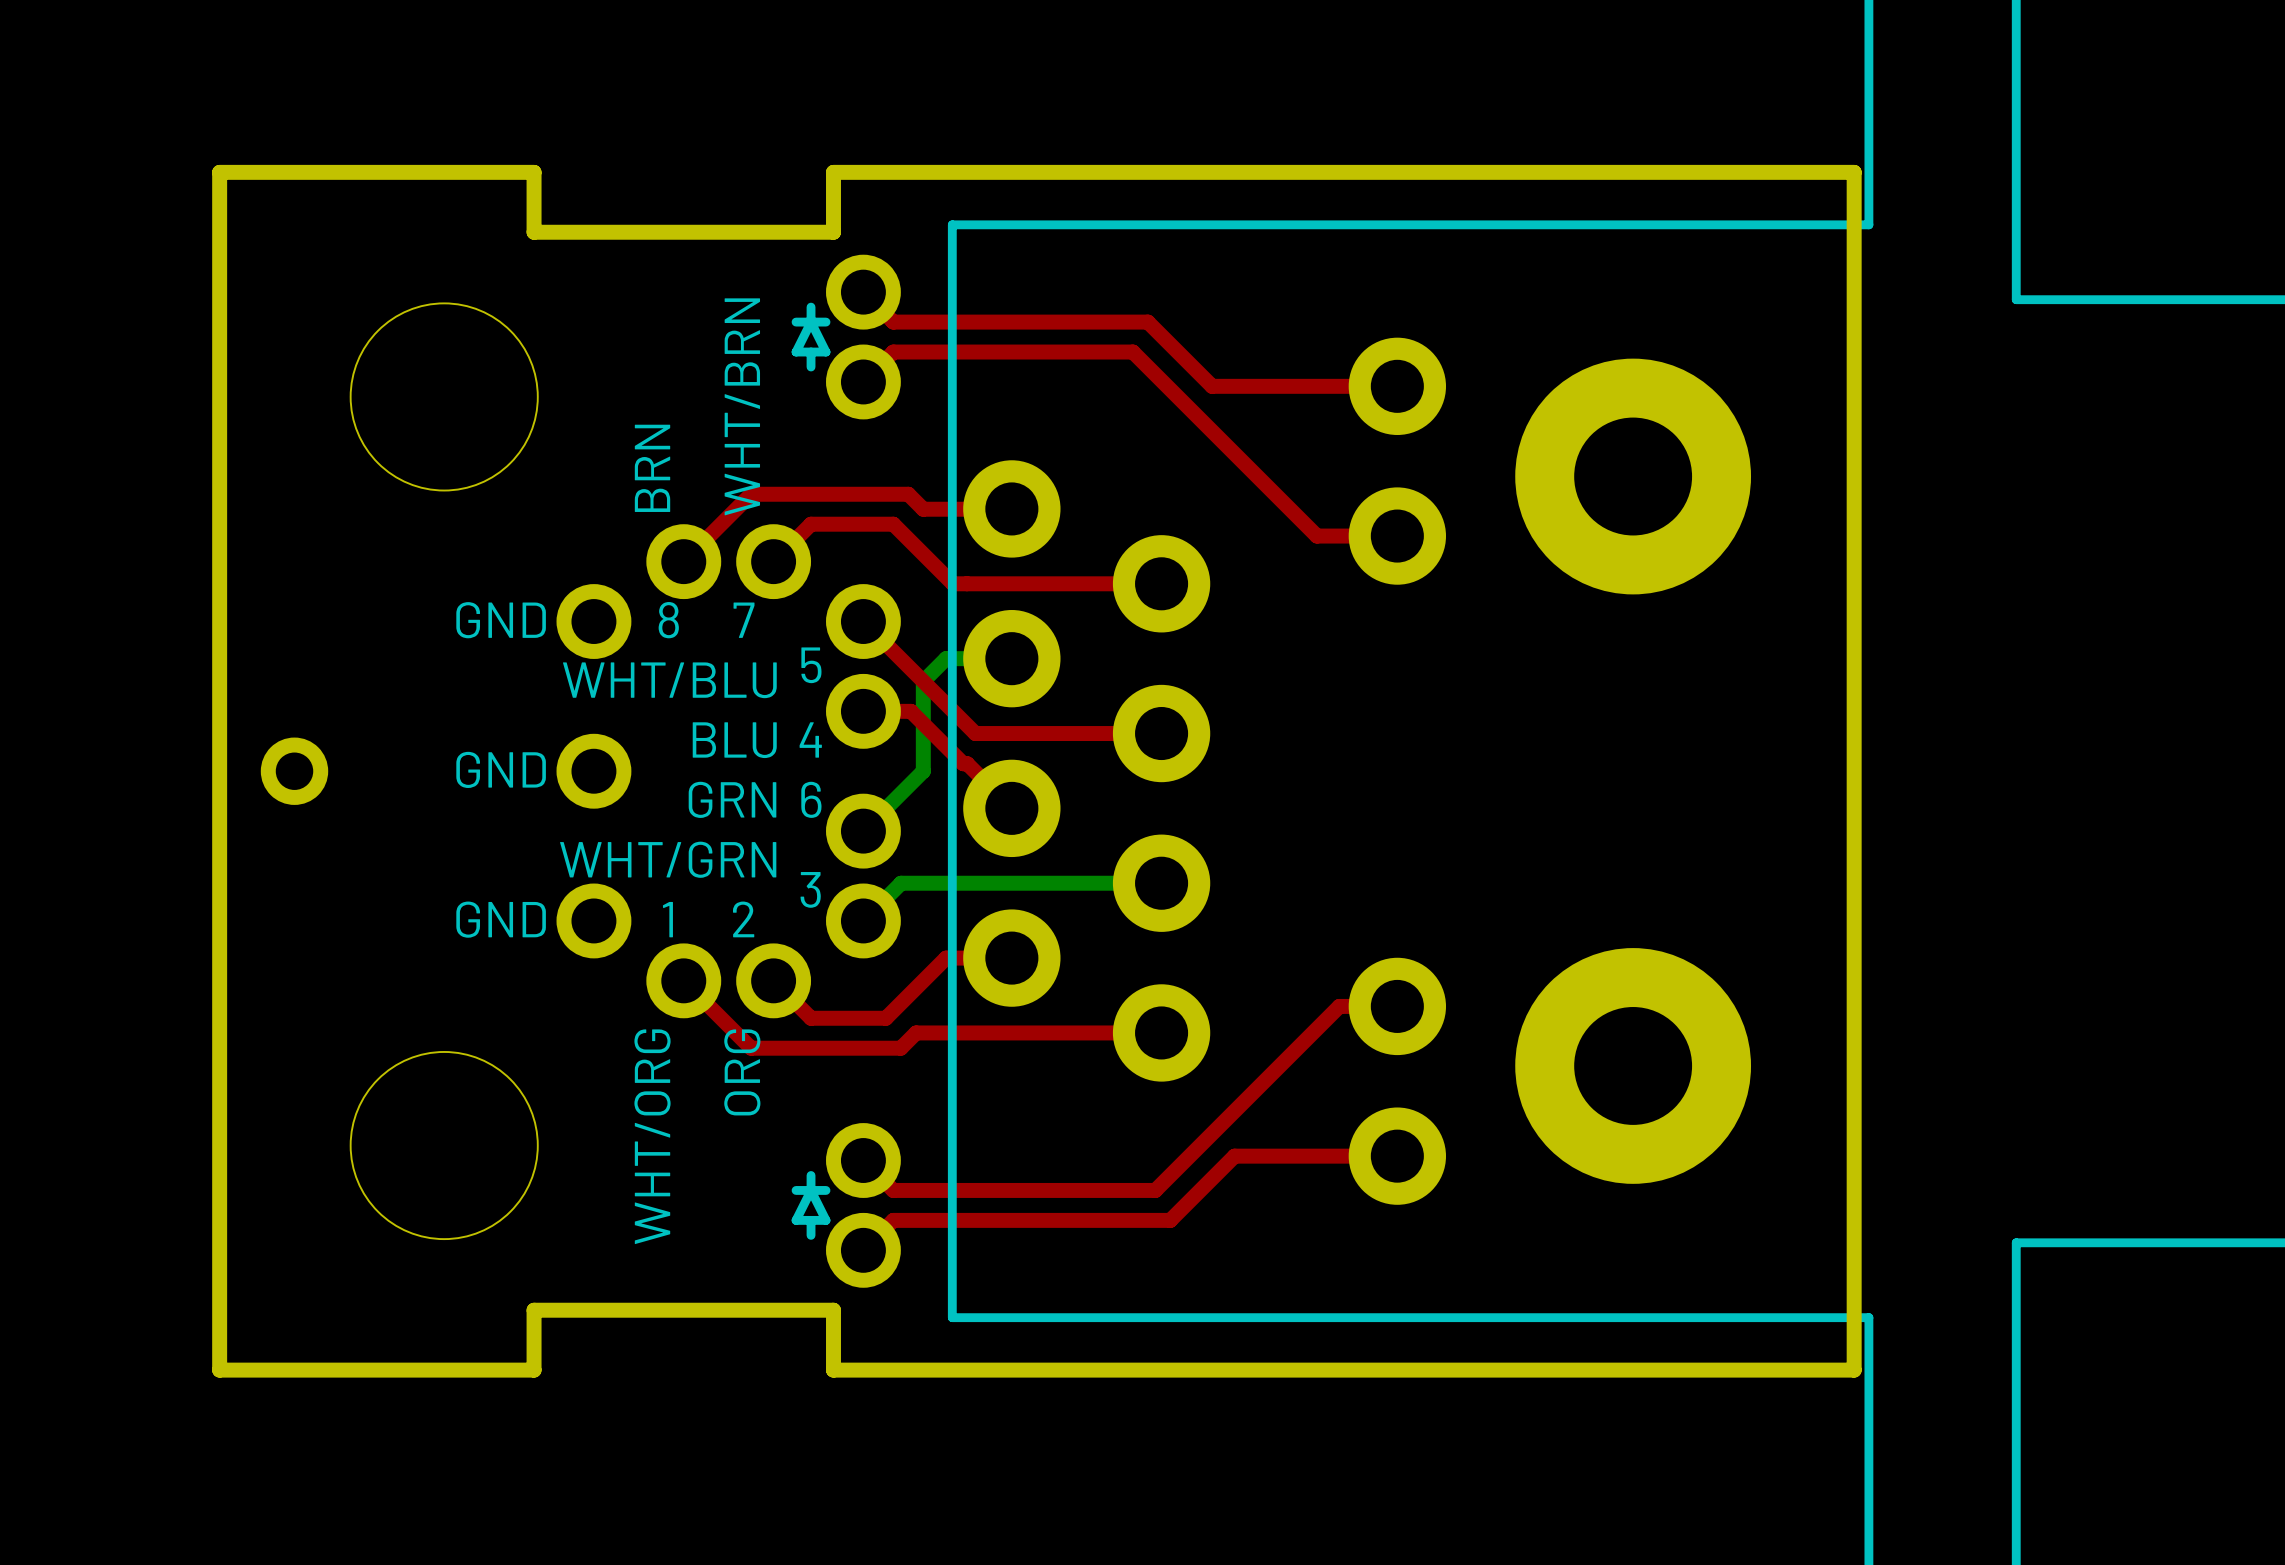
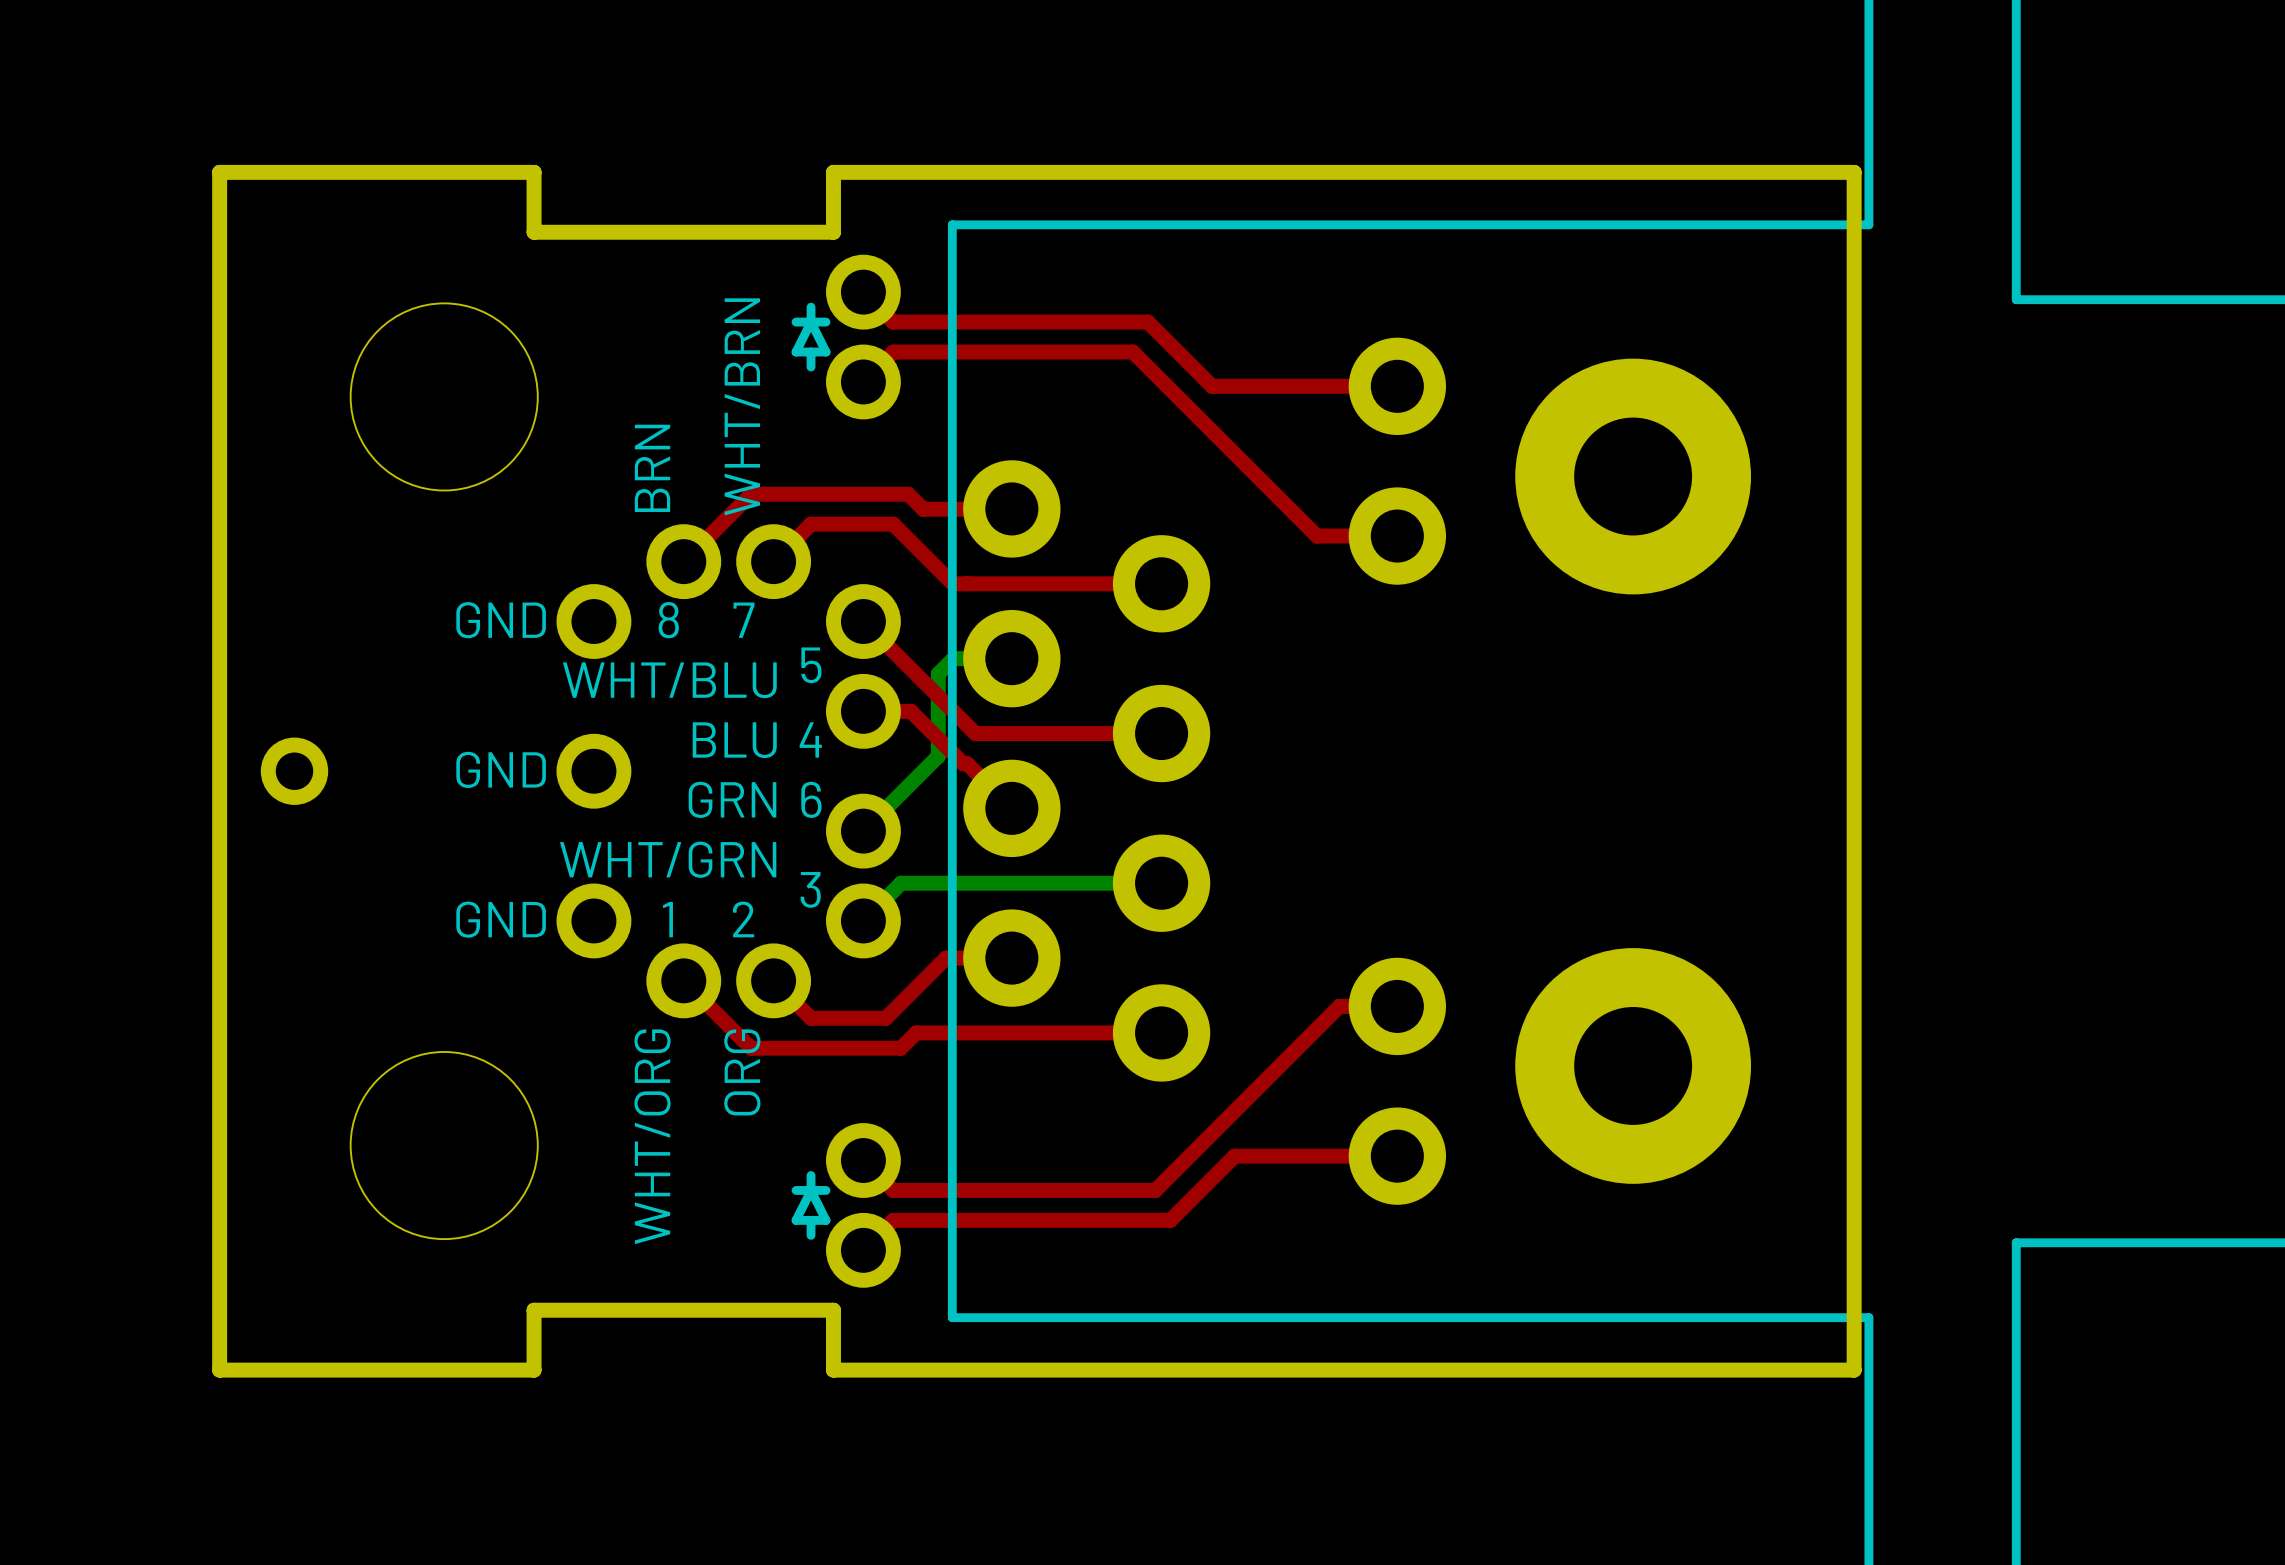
bottom track: (953, 658) (946, 658) (923, 681) (923, 771) -> (953, 658) (938, 673) (938, 756) (923, 771)

